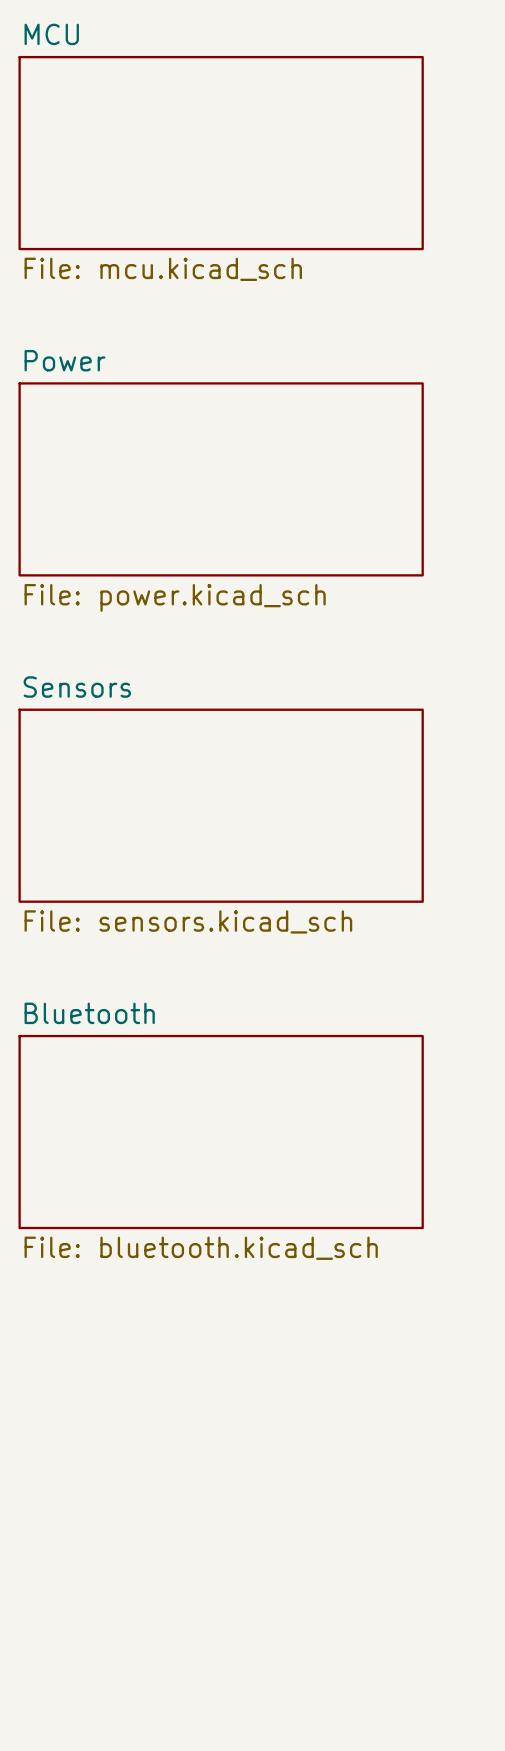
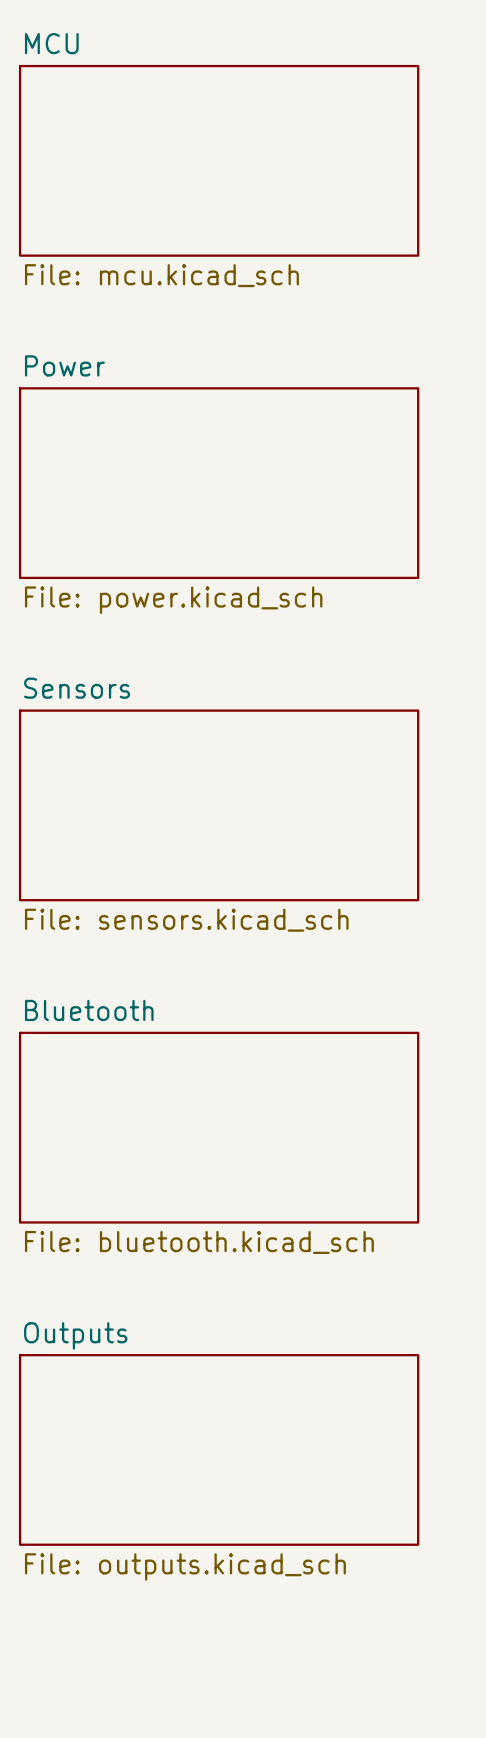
sheet Outputs: none -> File: outputs.kicad_sch (219, 1449)

